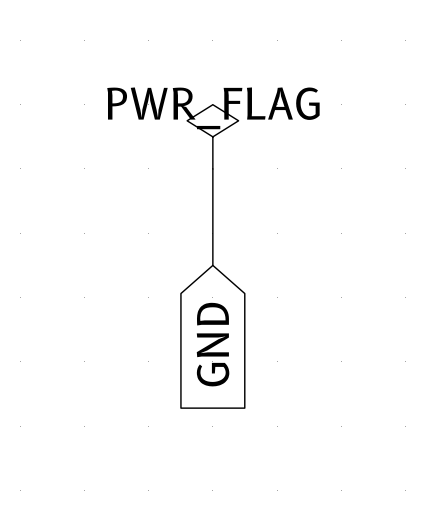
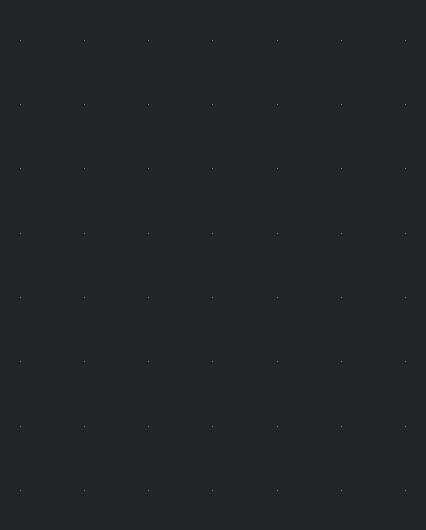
power symbol: PWR_FLAG (212, 136) -> none
wire: (212, 168) (212, 265) -> none
global label: GND (213, 344) -> none

